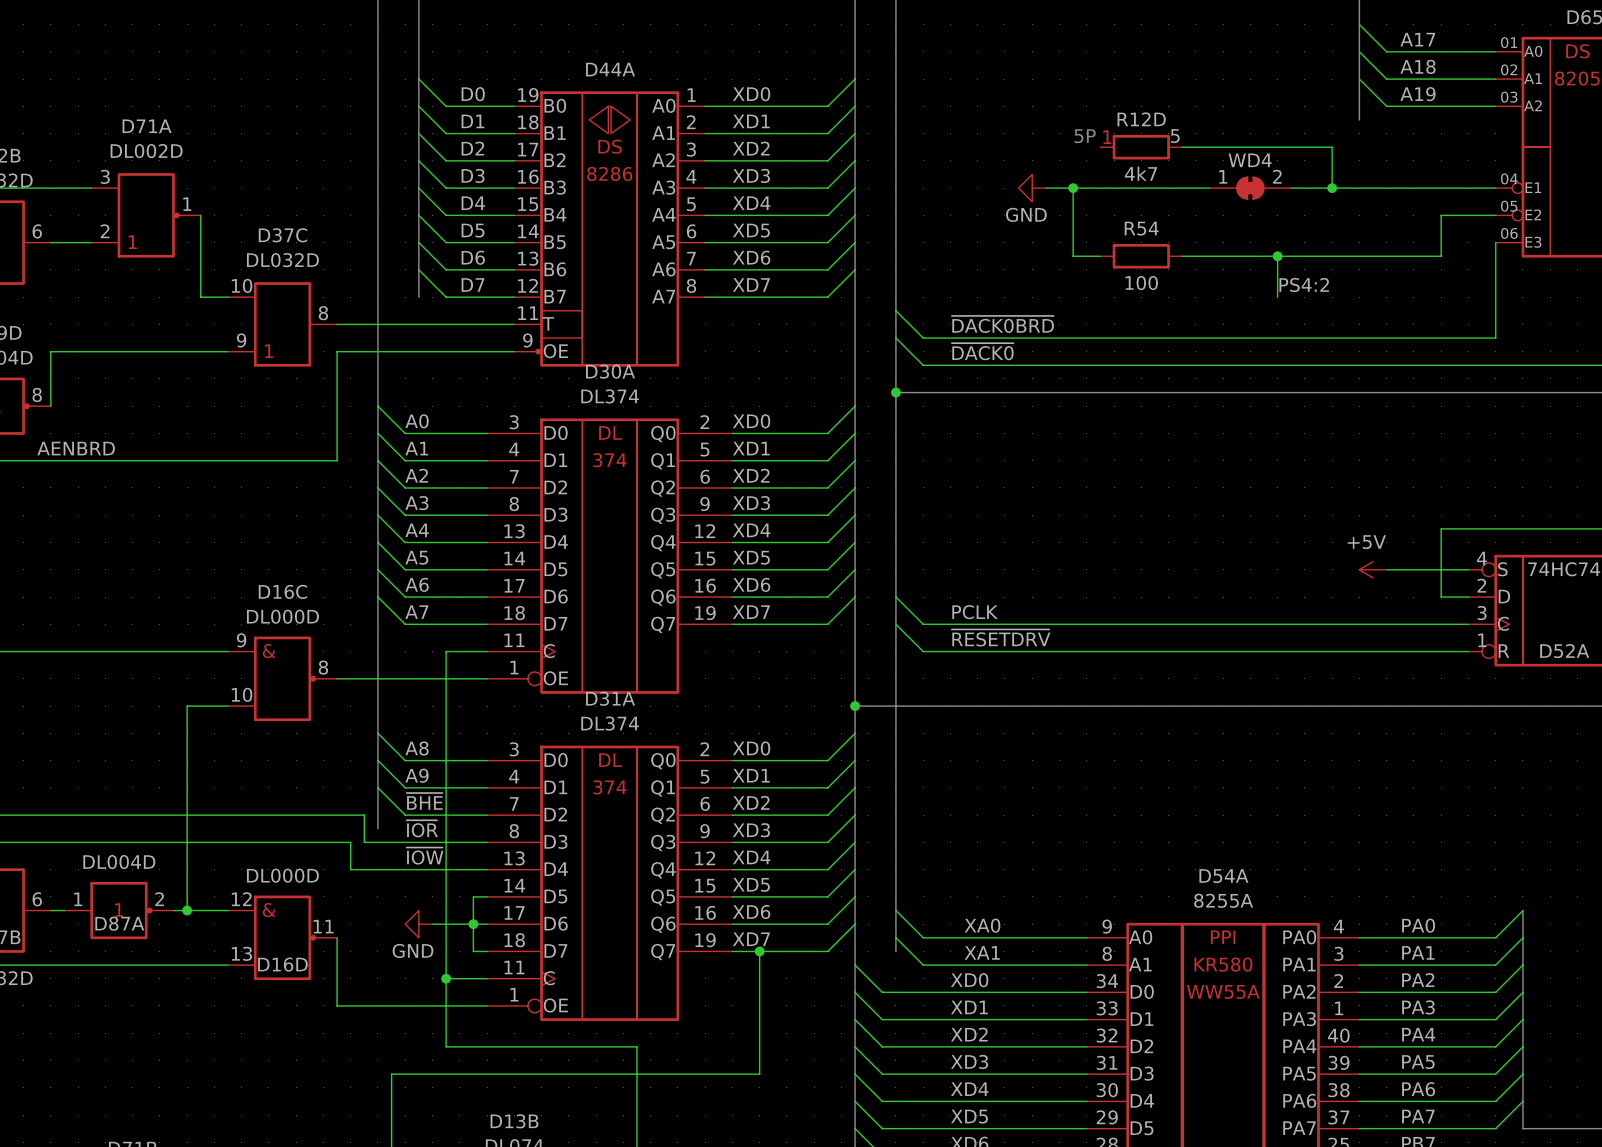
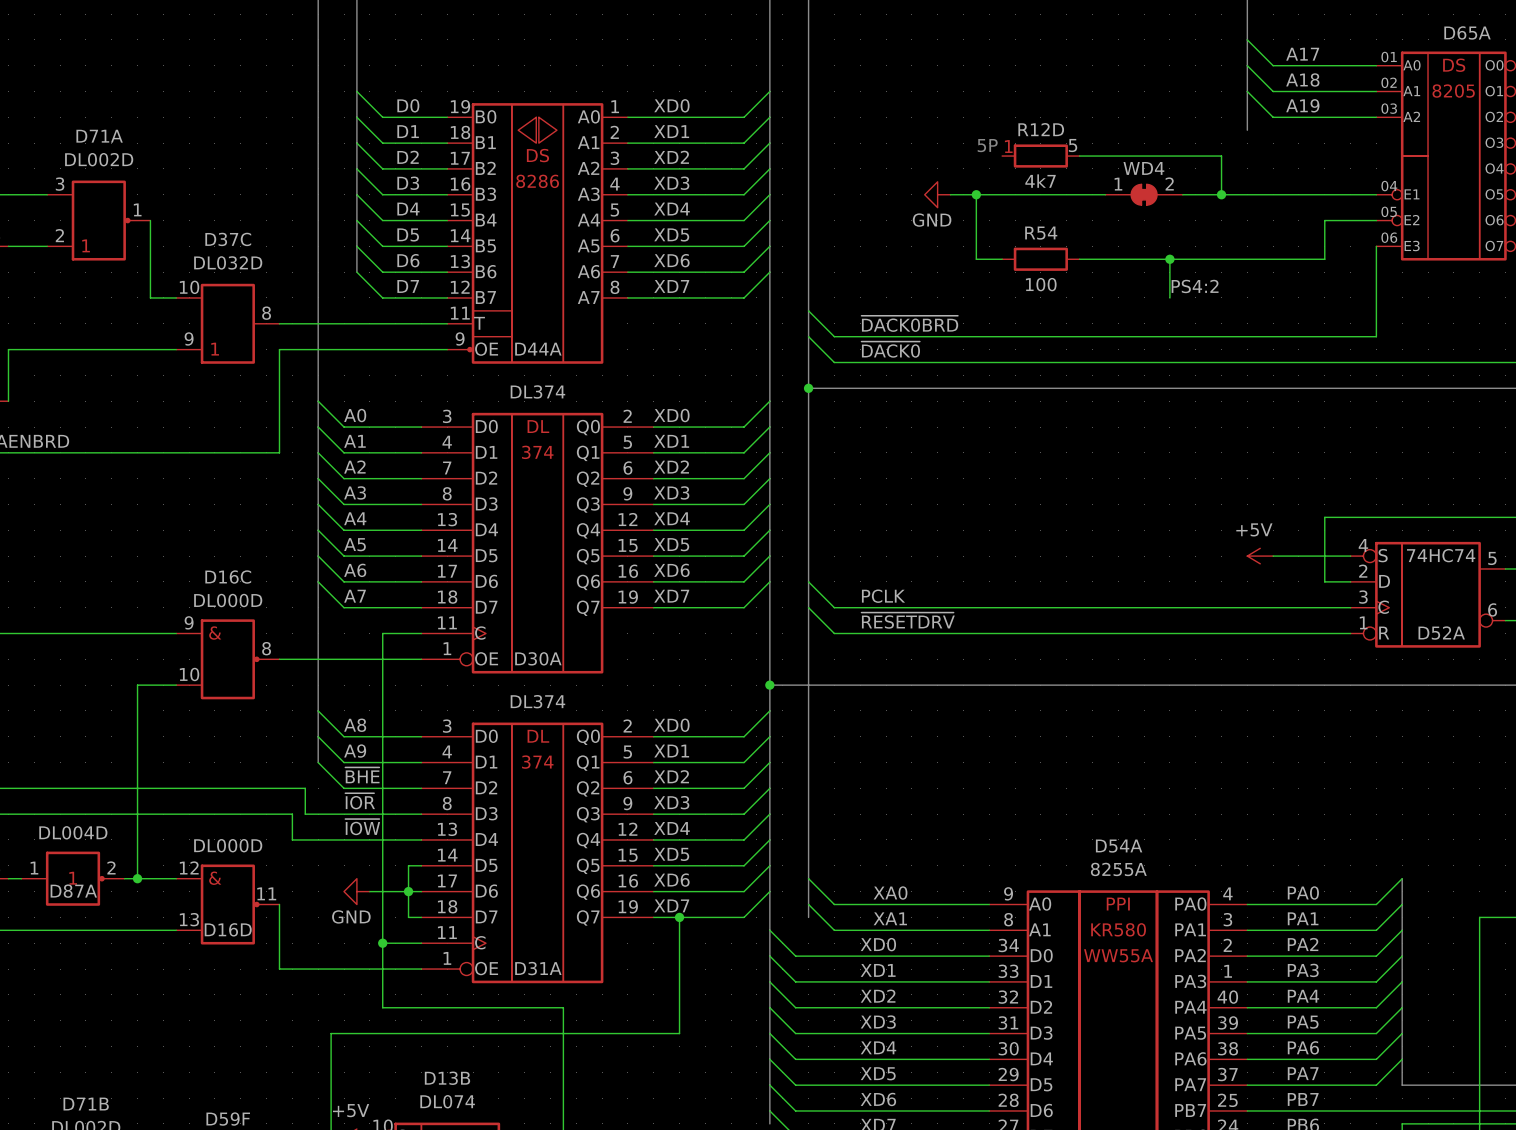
D44A name position: D44A (610, 69) -> D44A (538, 349)
bus: (418, 269) (418, 297) -> none
D30A name position: D30A (610, 371) -> D30A (538, 658)
D31A name position: D31A (610, 698) -> D31A (538, 968)
bus: (377, 787) (377, 828) -> none

